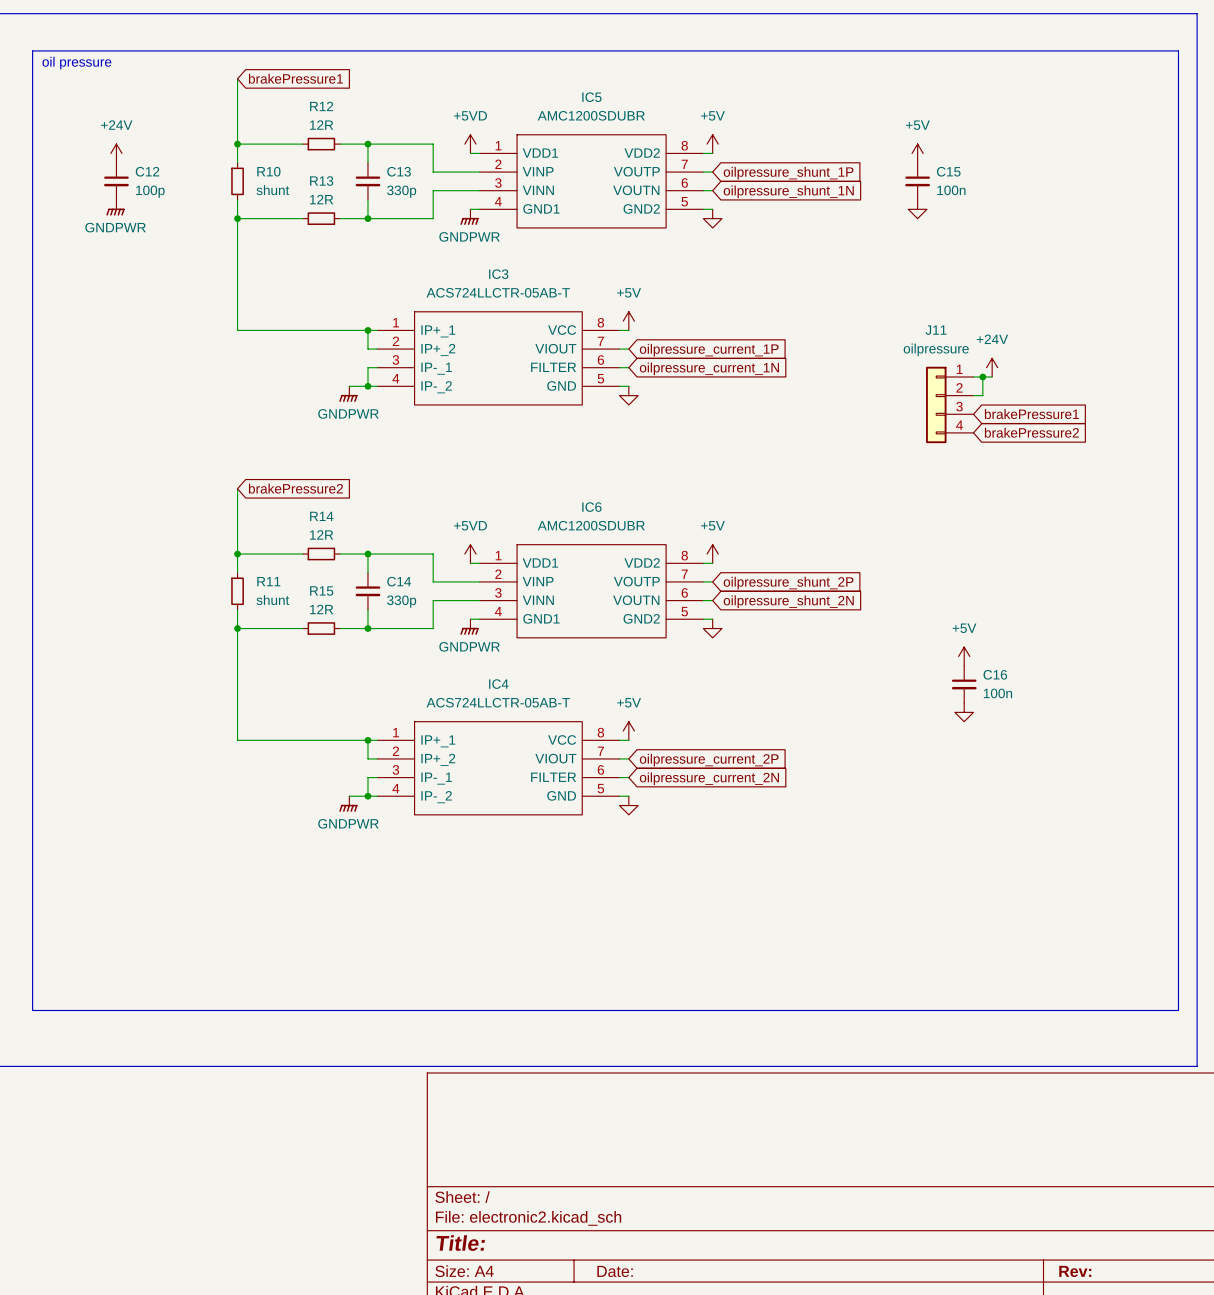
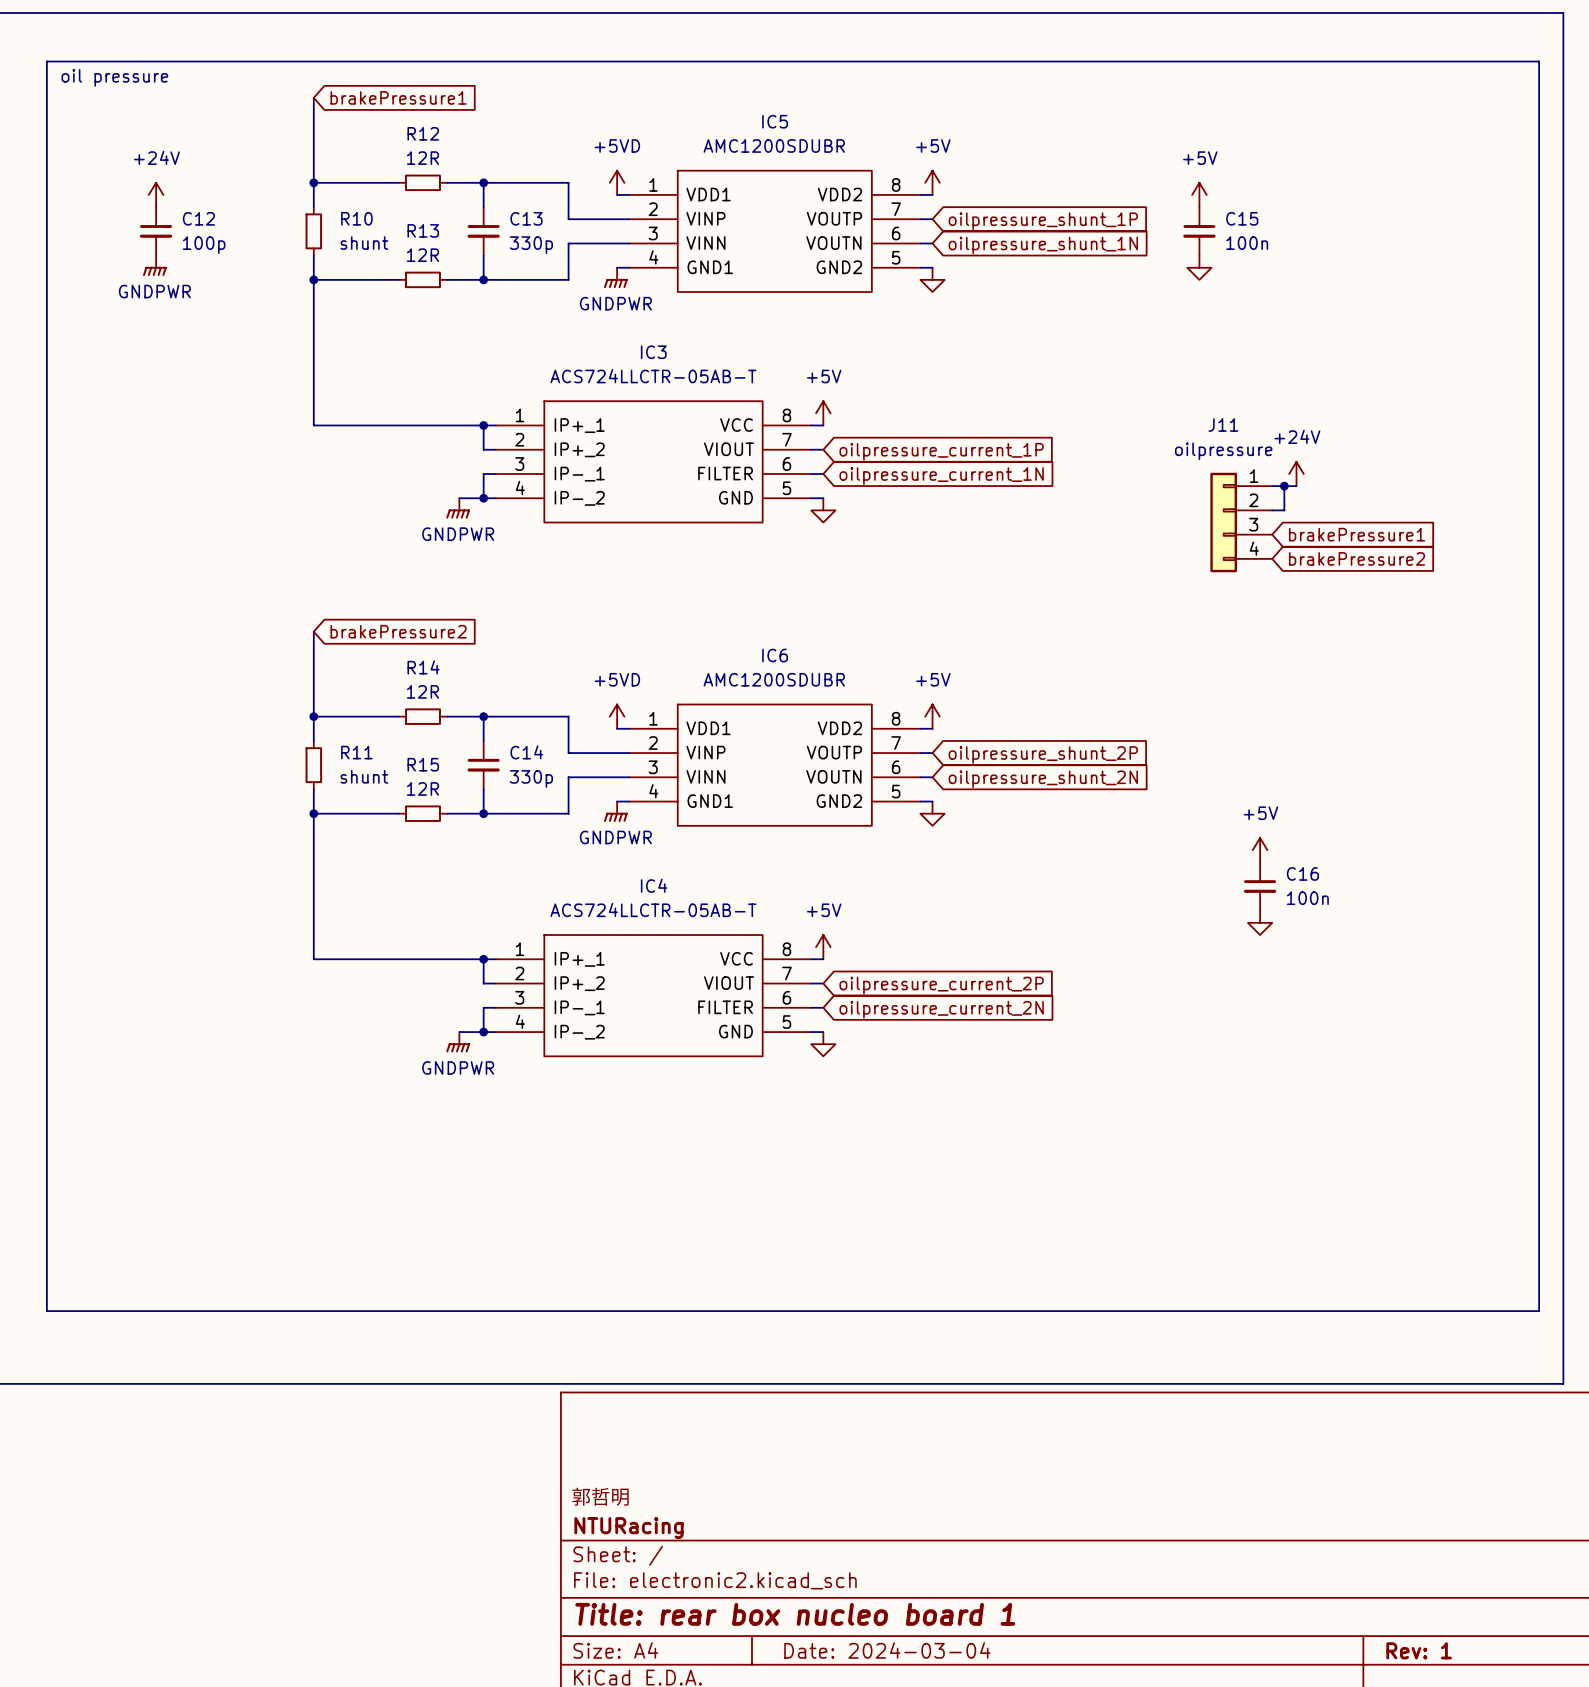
title block: none -> 郭哲明 (600, 1496)
title block: none -> NTURacing (629, 1528)
title block: Title: (460, 1243) -> Title: rear box nucleo board 1 (795, 1614)
title block: Date: (615, 1271) -> Date: 2024-03-04 (887, 1650)
title block: Rev: (1075, 1271) -> Rev: 1 (1419, 1650)

